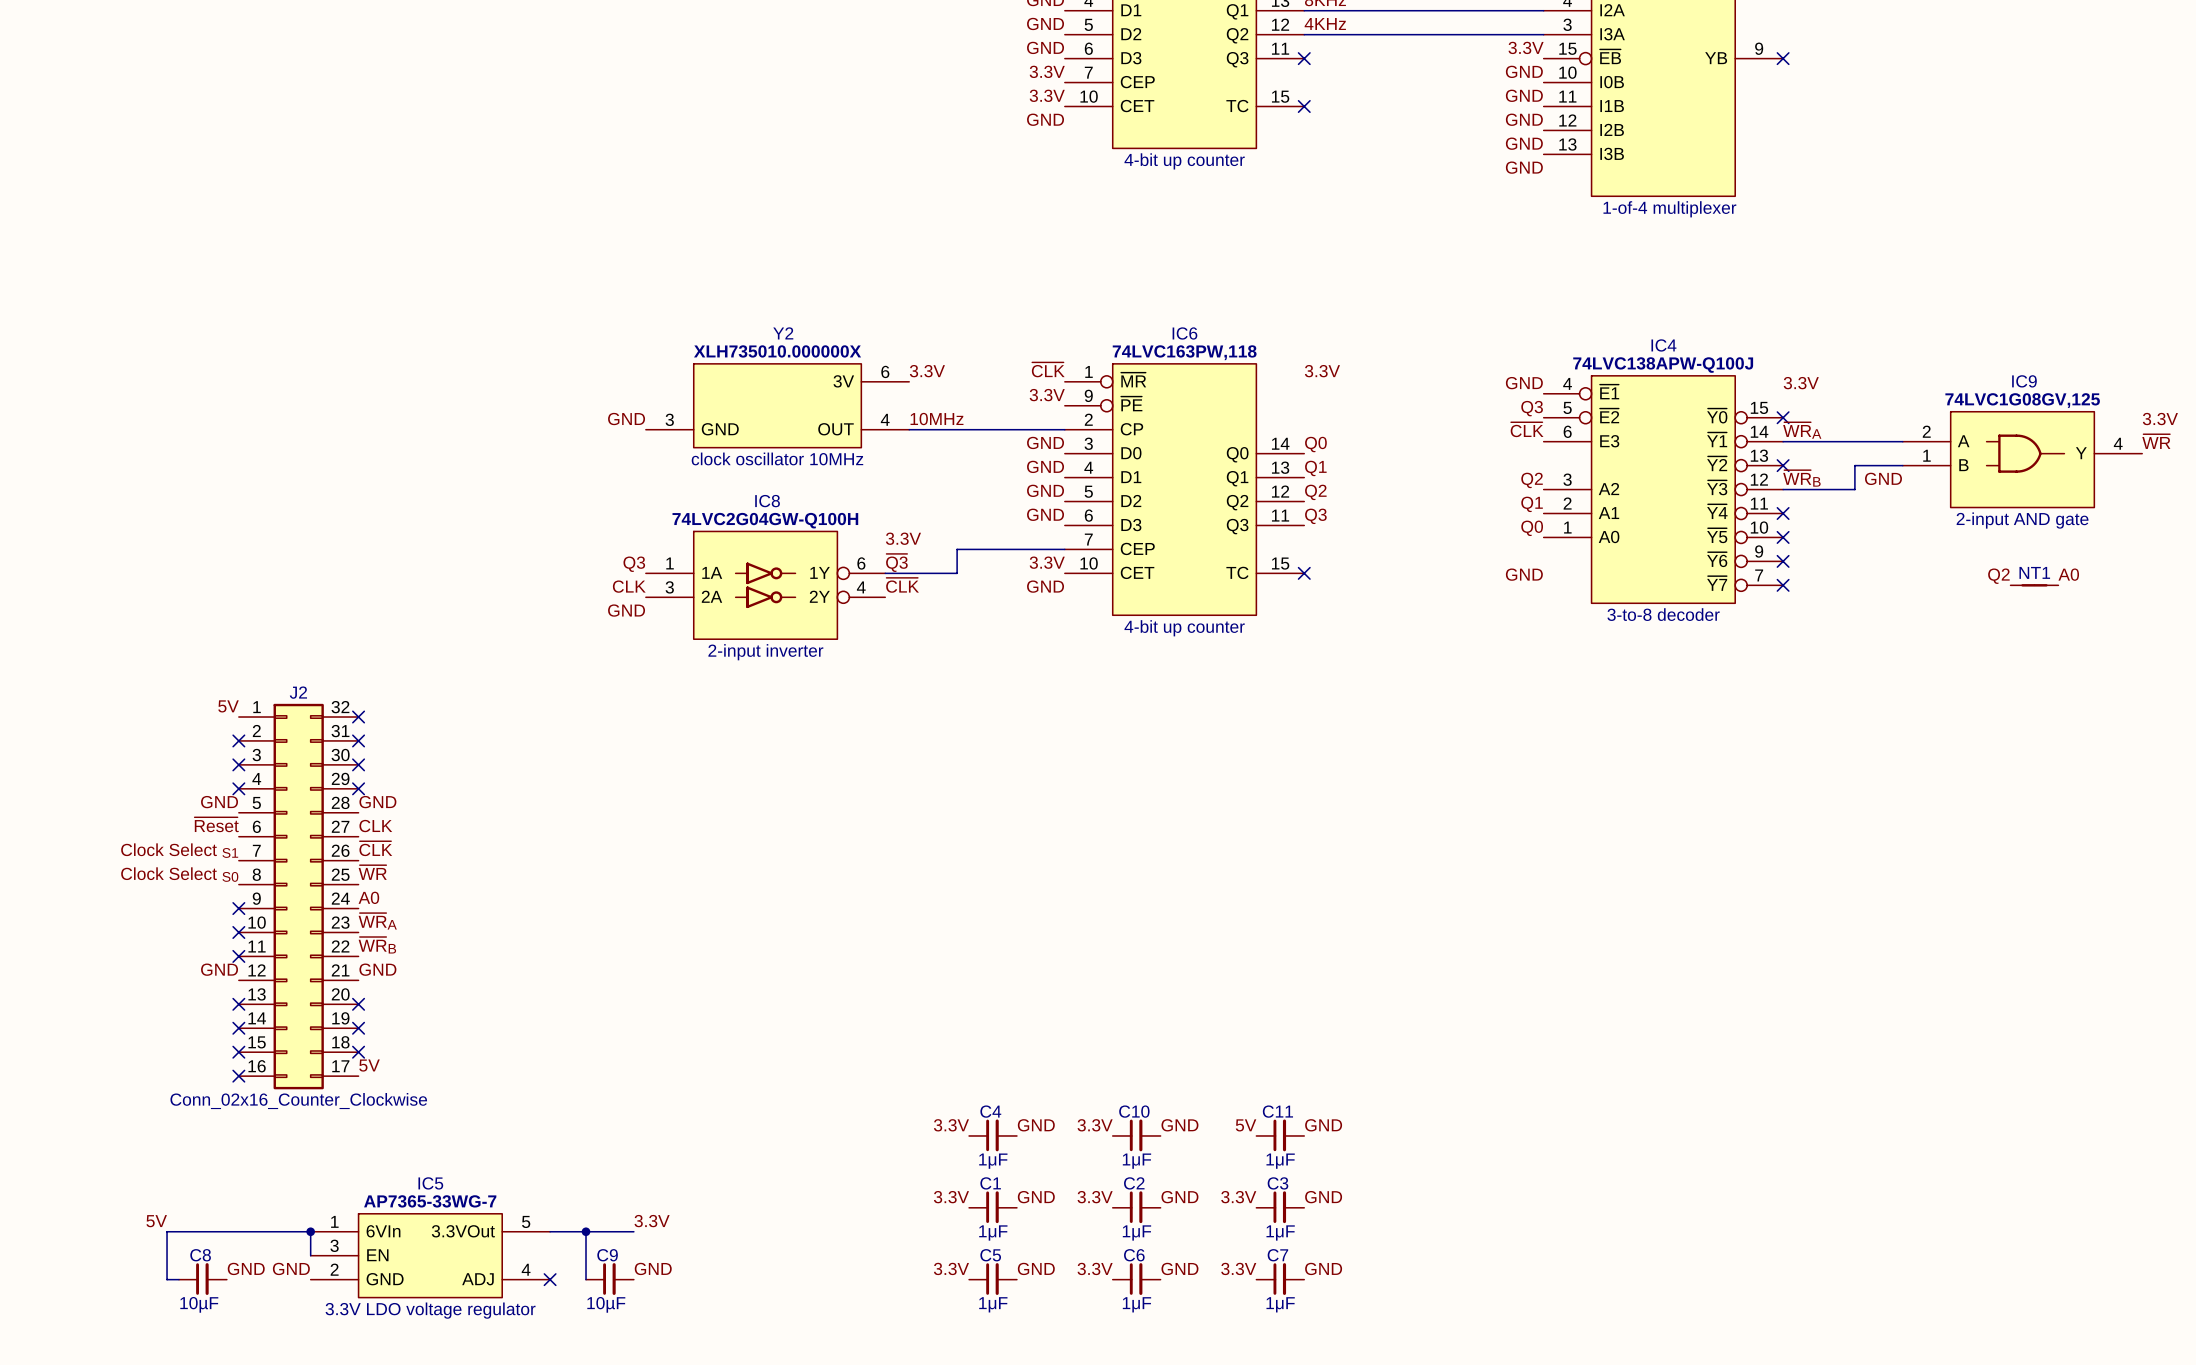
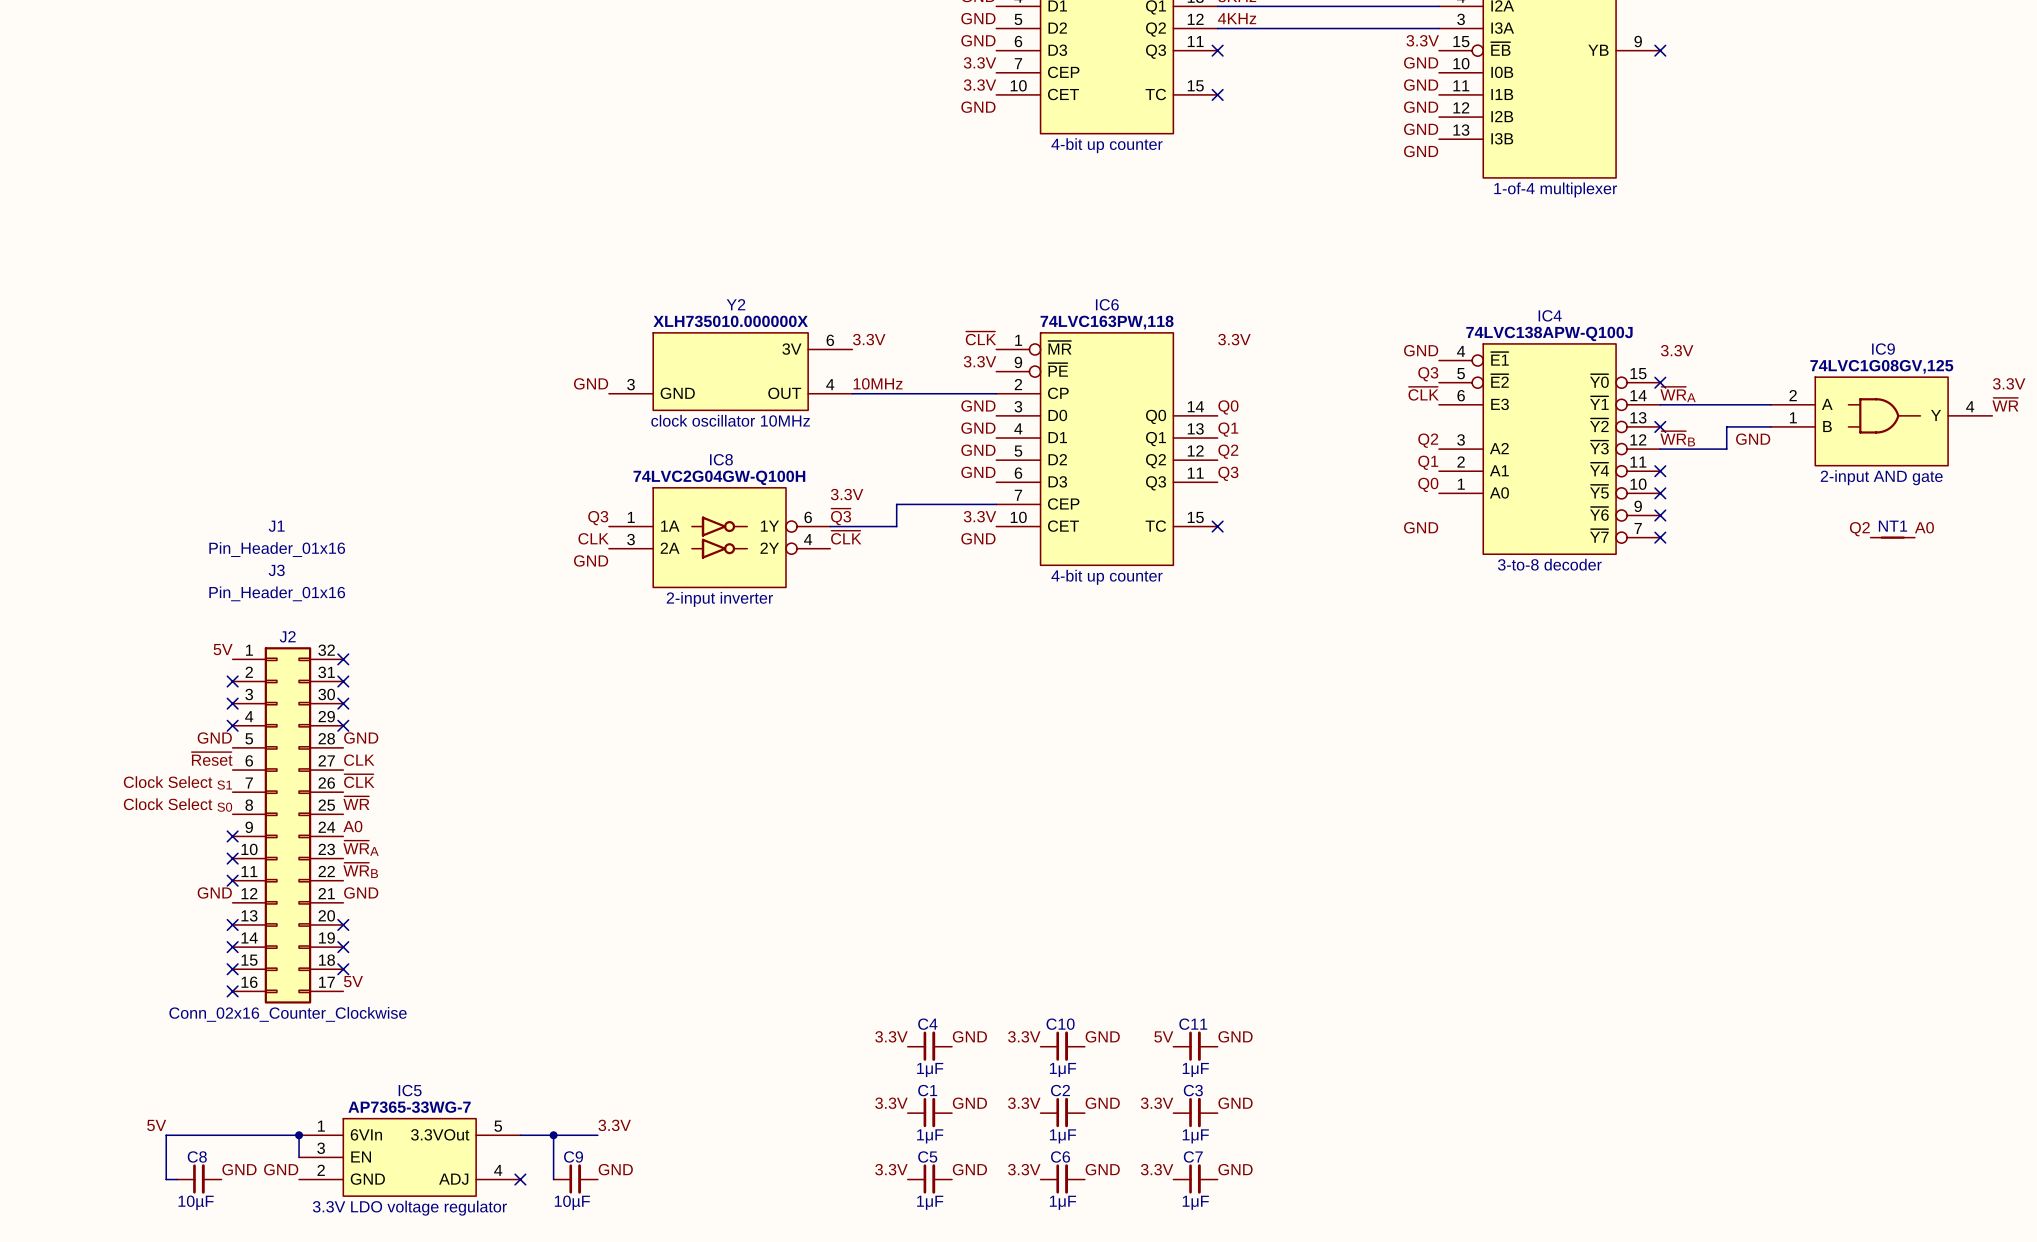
J1: none -> Pin_Header_01x16 (277, 538)
J3: none -> Pin_Header_01x16 (277, 582)

